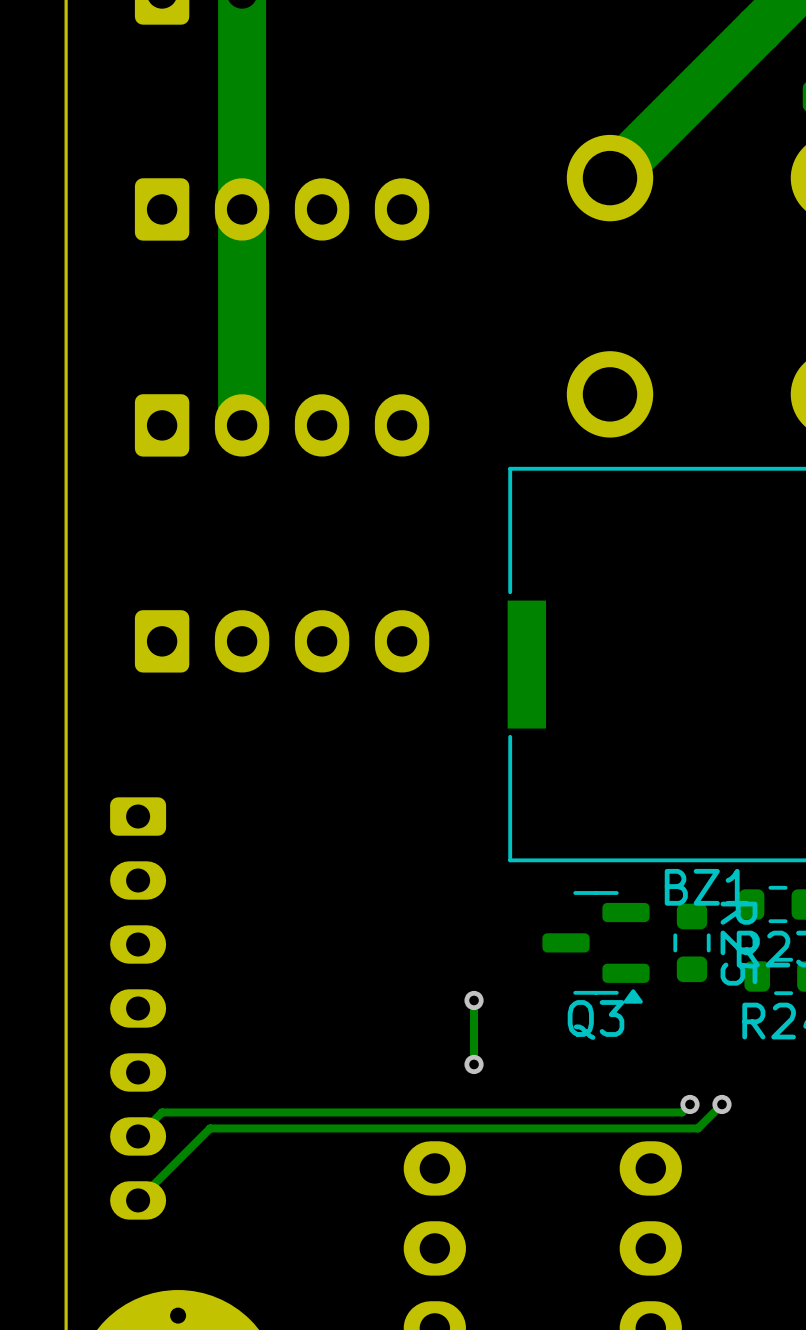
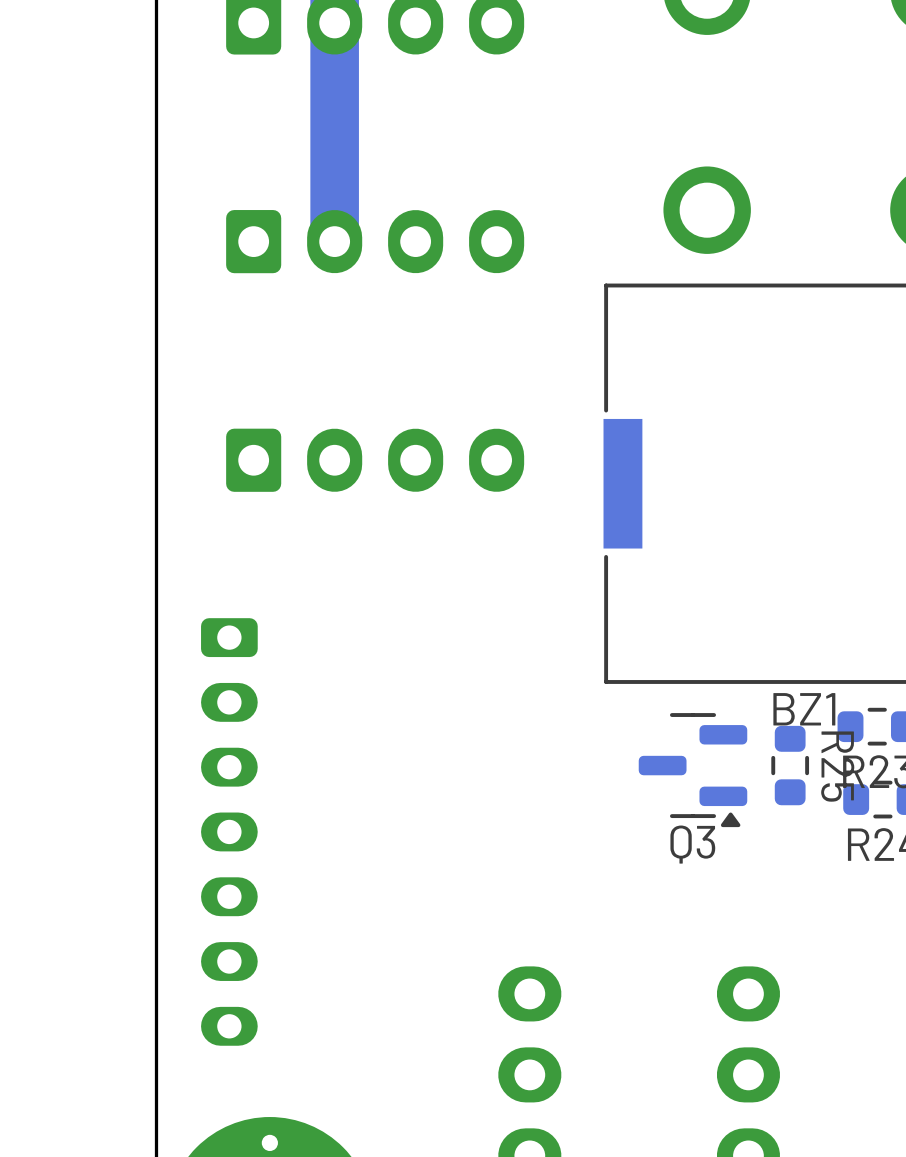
track: (474, 1000) (474, 1064) -> none
via: (474, 1000) -> none
via: (474, 1064) -> none
track: (689, 1104) (681, 1112) (162, 1112) (138, 1136) -> none
via: (689, 1104) -> none
track: (721, 1104) (697, 1128) (210, 1128) (138, 1200) -> none
via: (721, 1104) -> none

